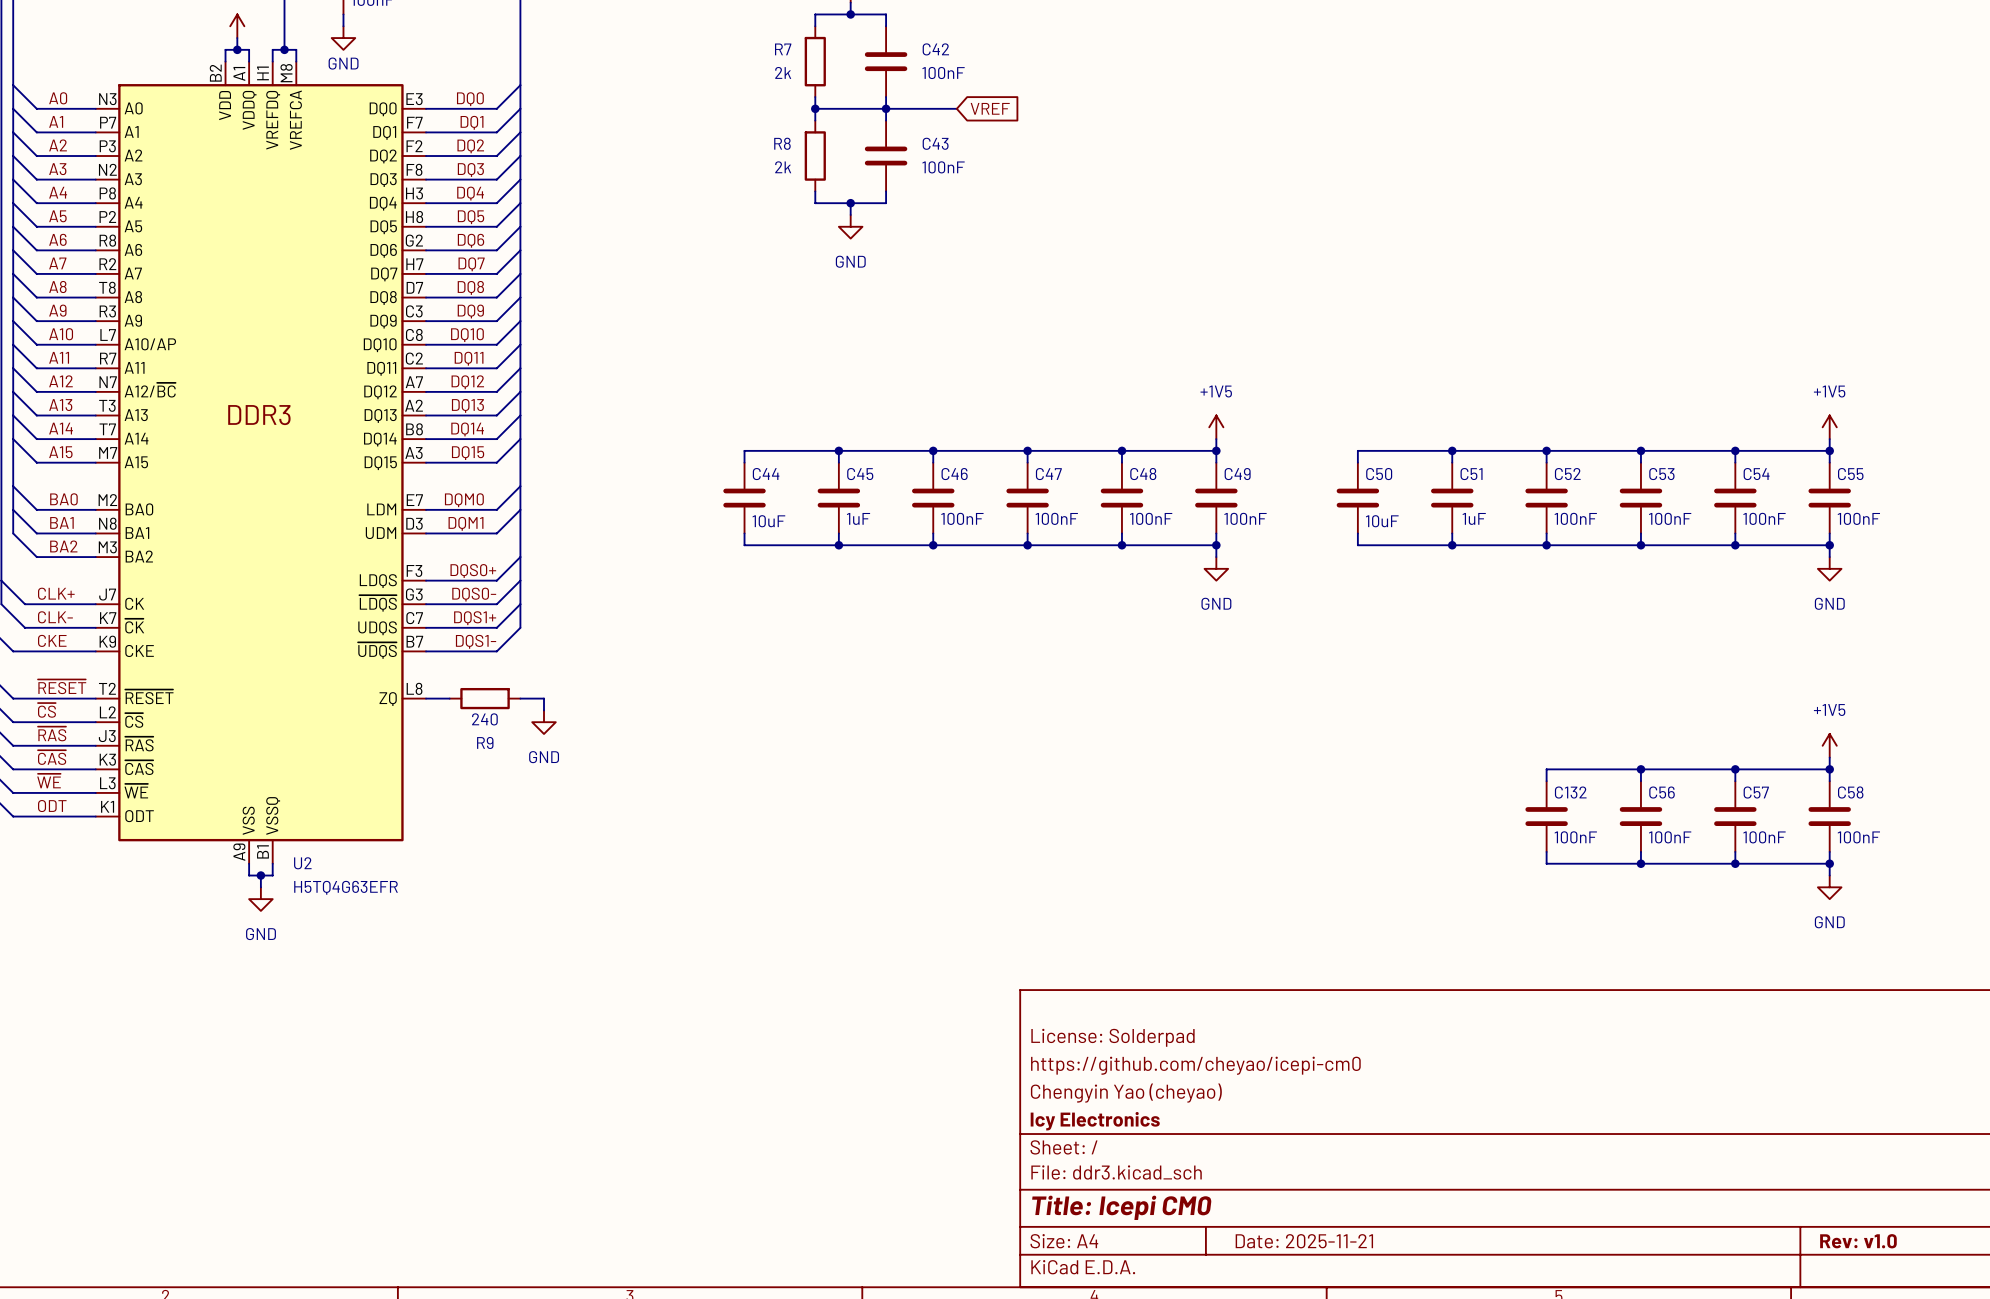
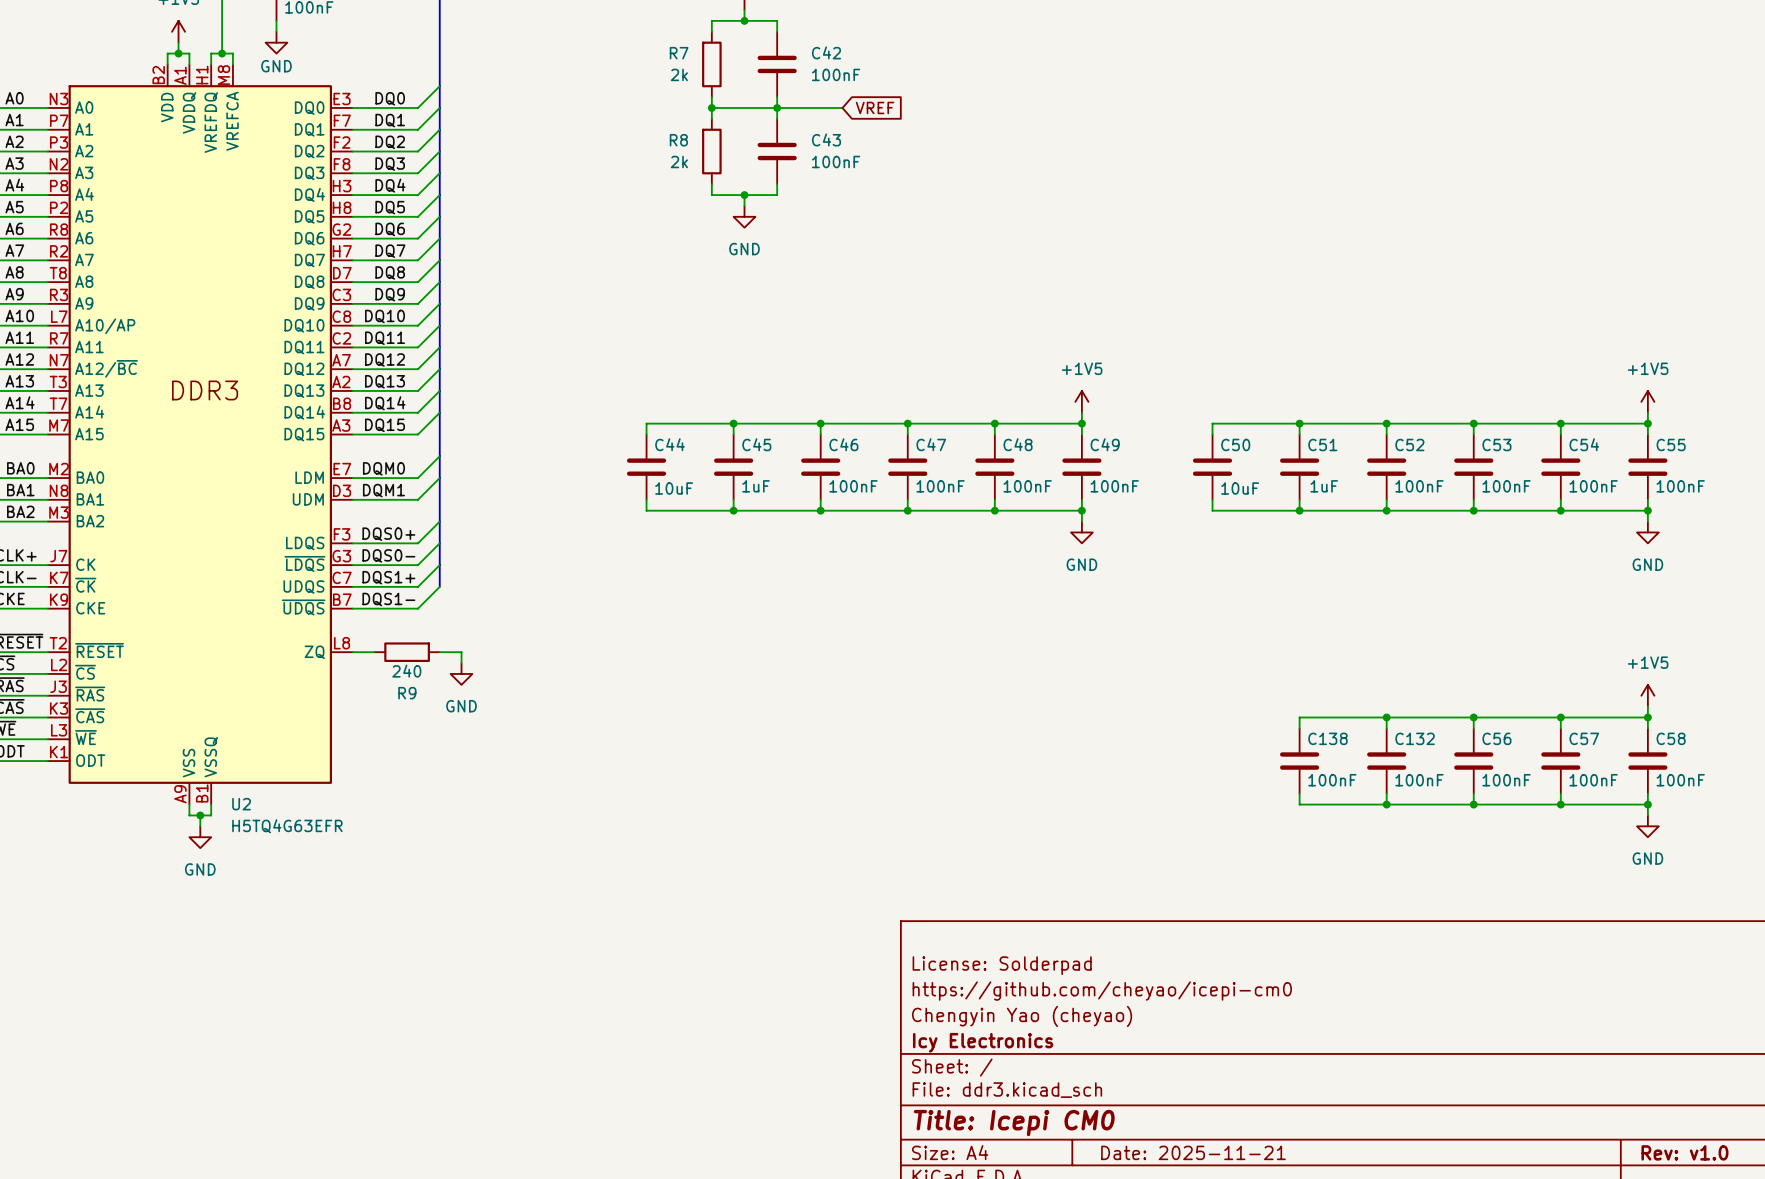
wire: none -> (1386, 717) (1299, 717) (1299, 728)
junction: none -> (1386, 717)
C138: none -> 100nF (1299, 761)
wire: none -> (1299, 793) (1299, 804) (1386, 804)
junction: none -> (1386, 804)

